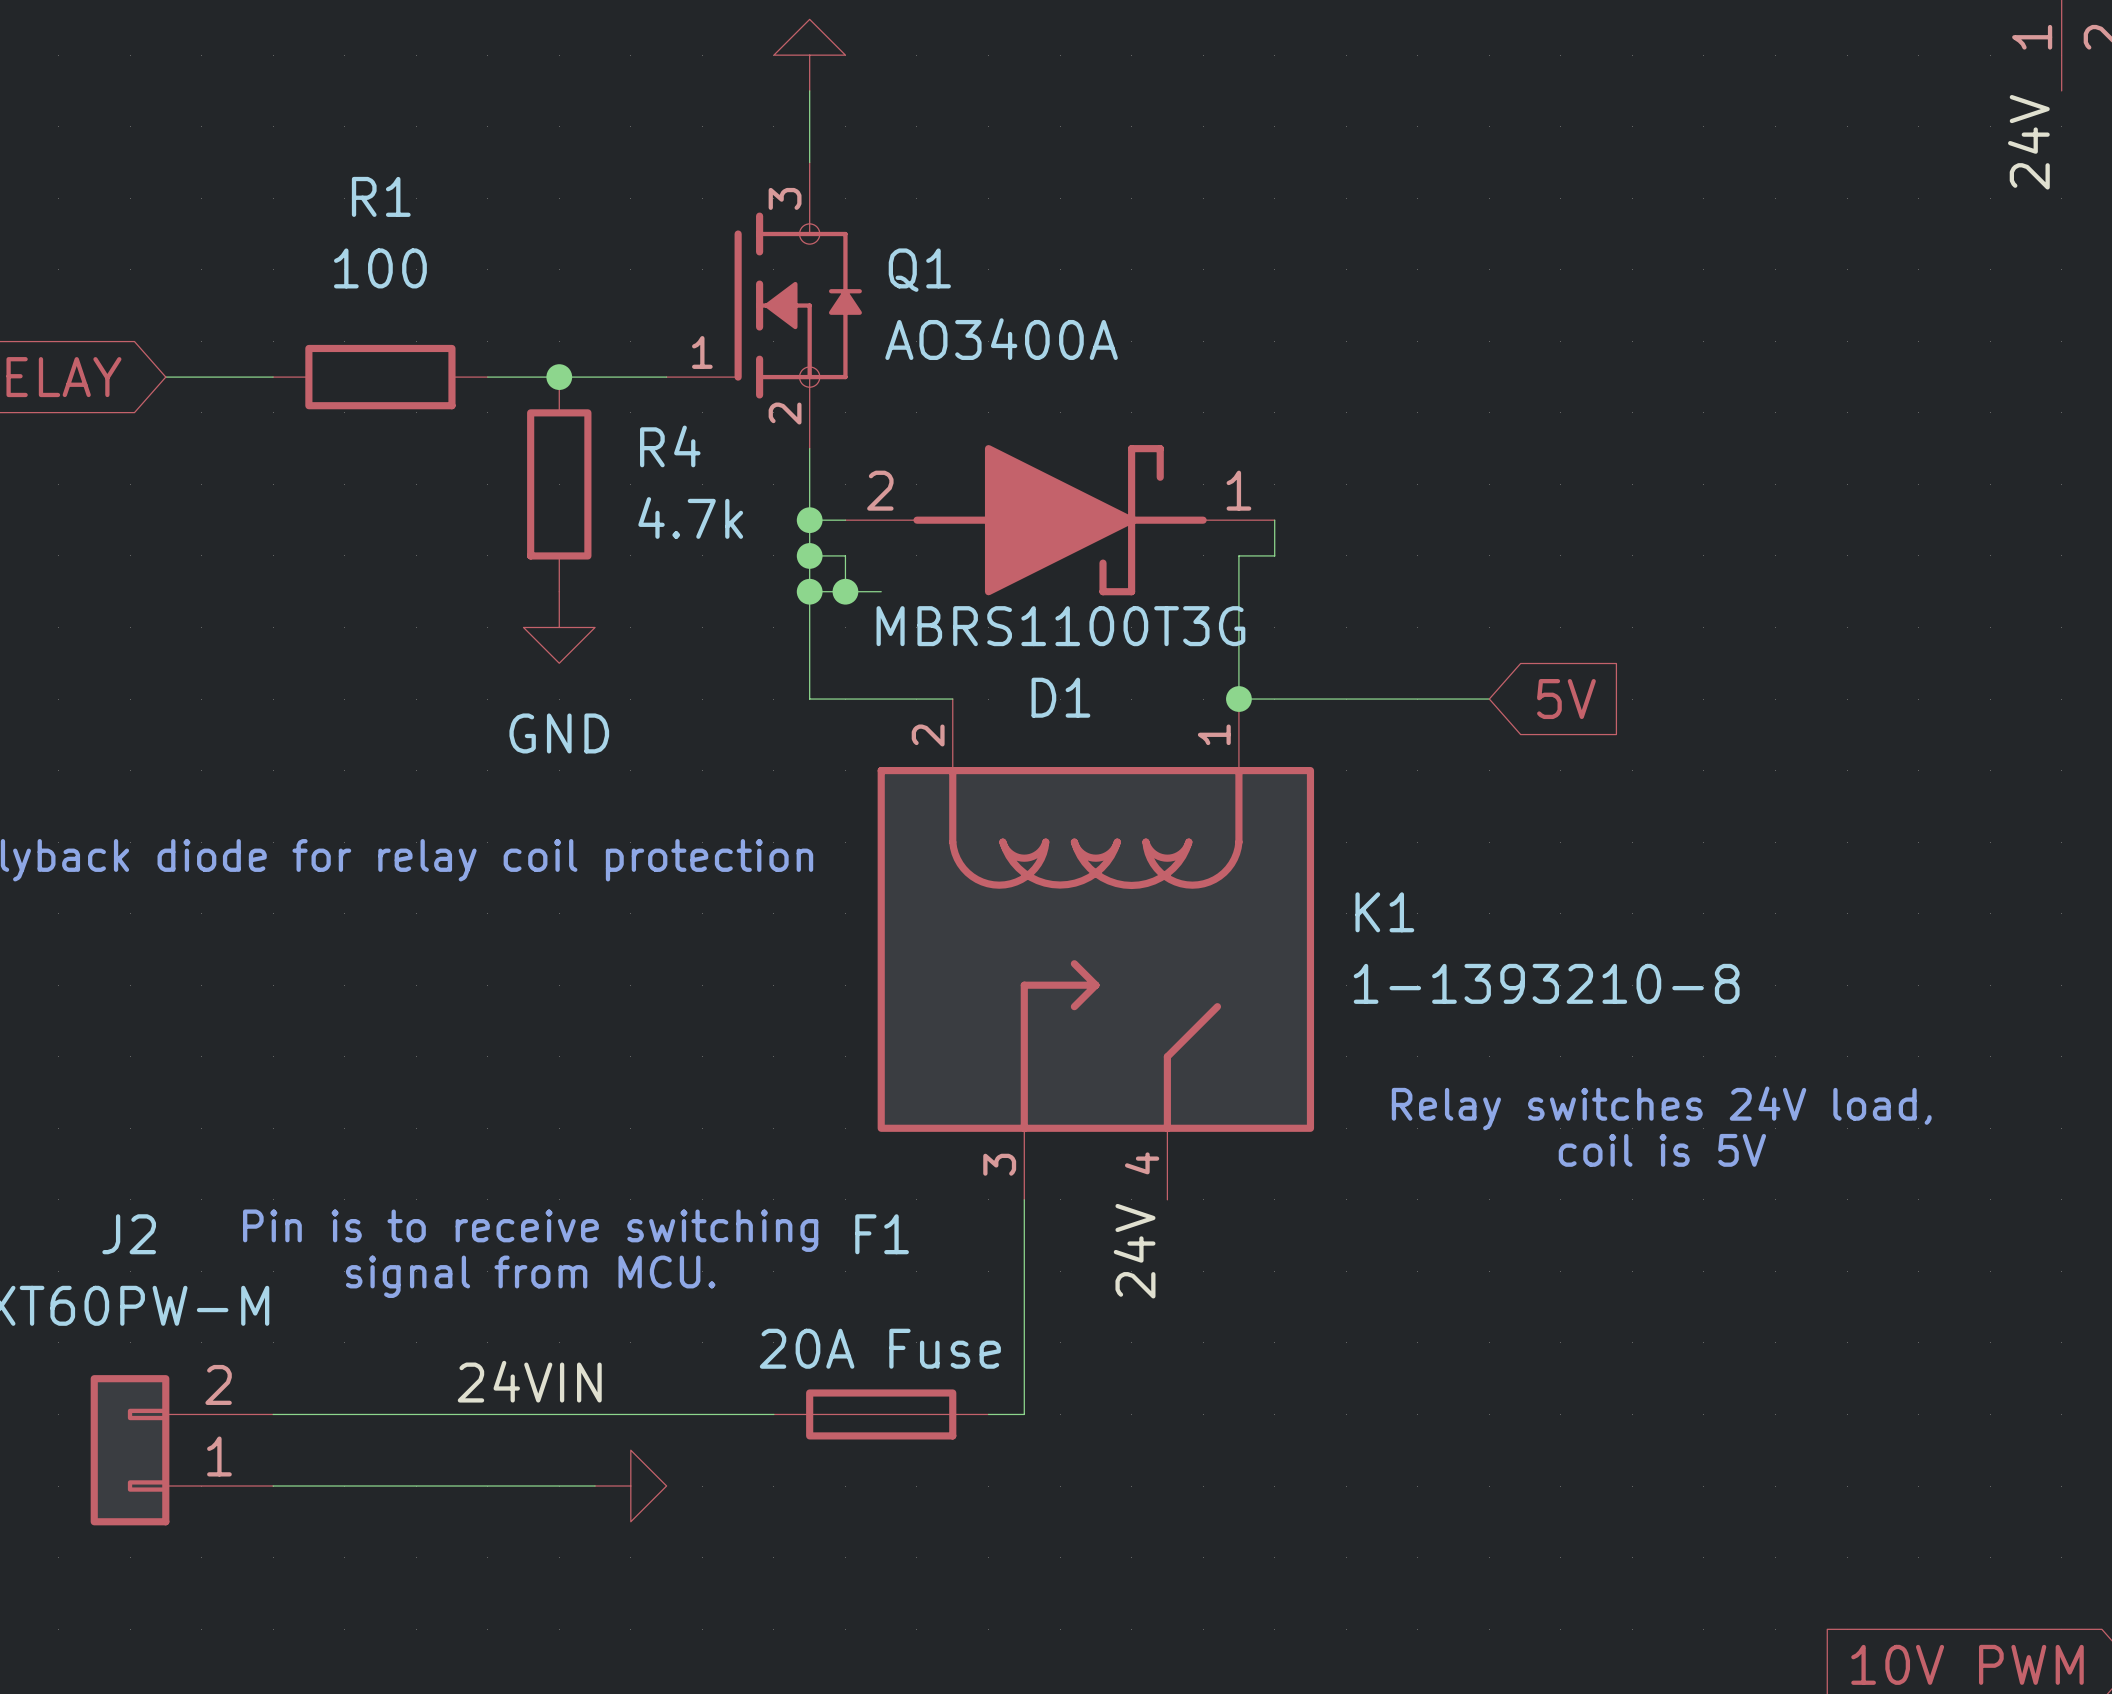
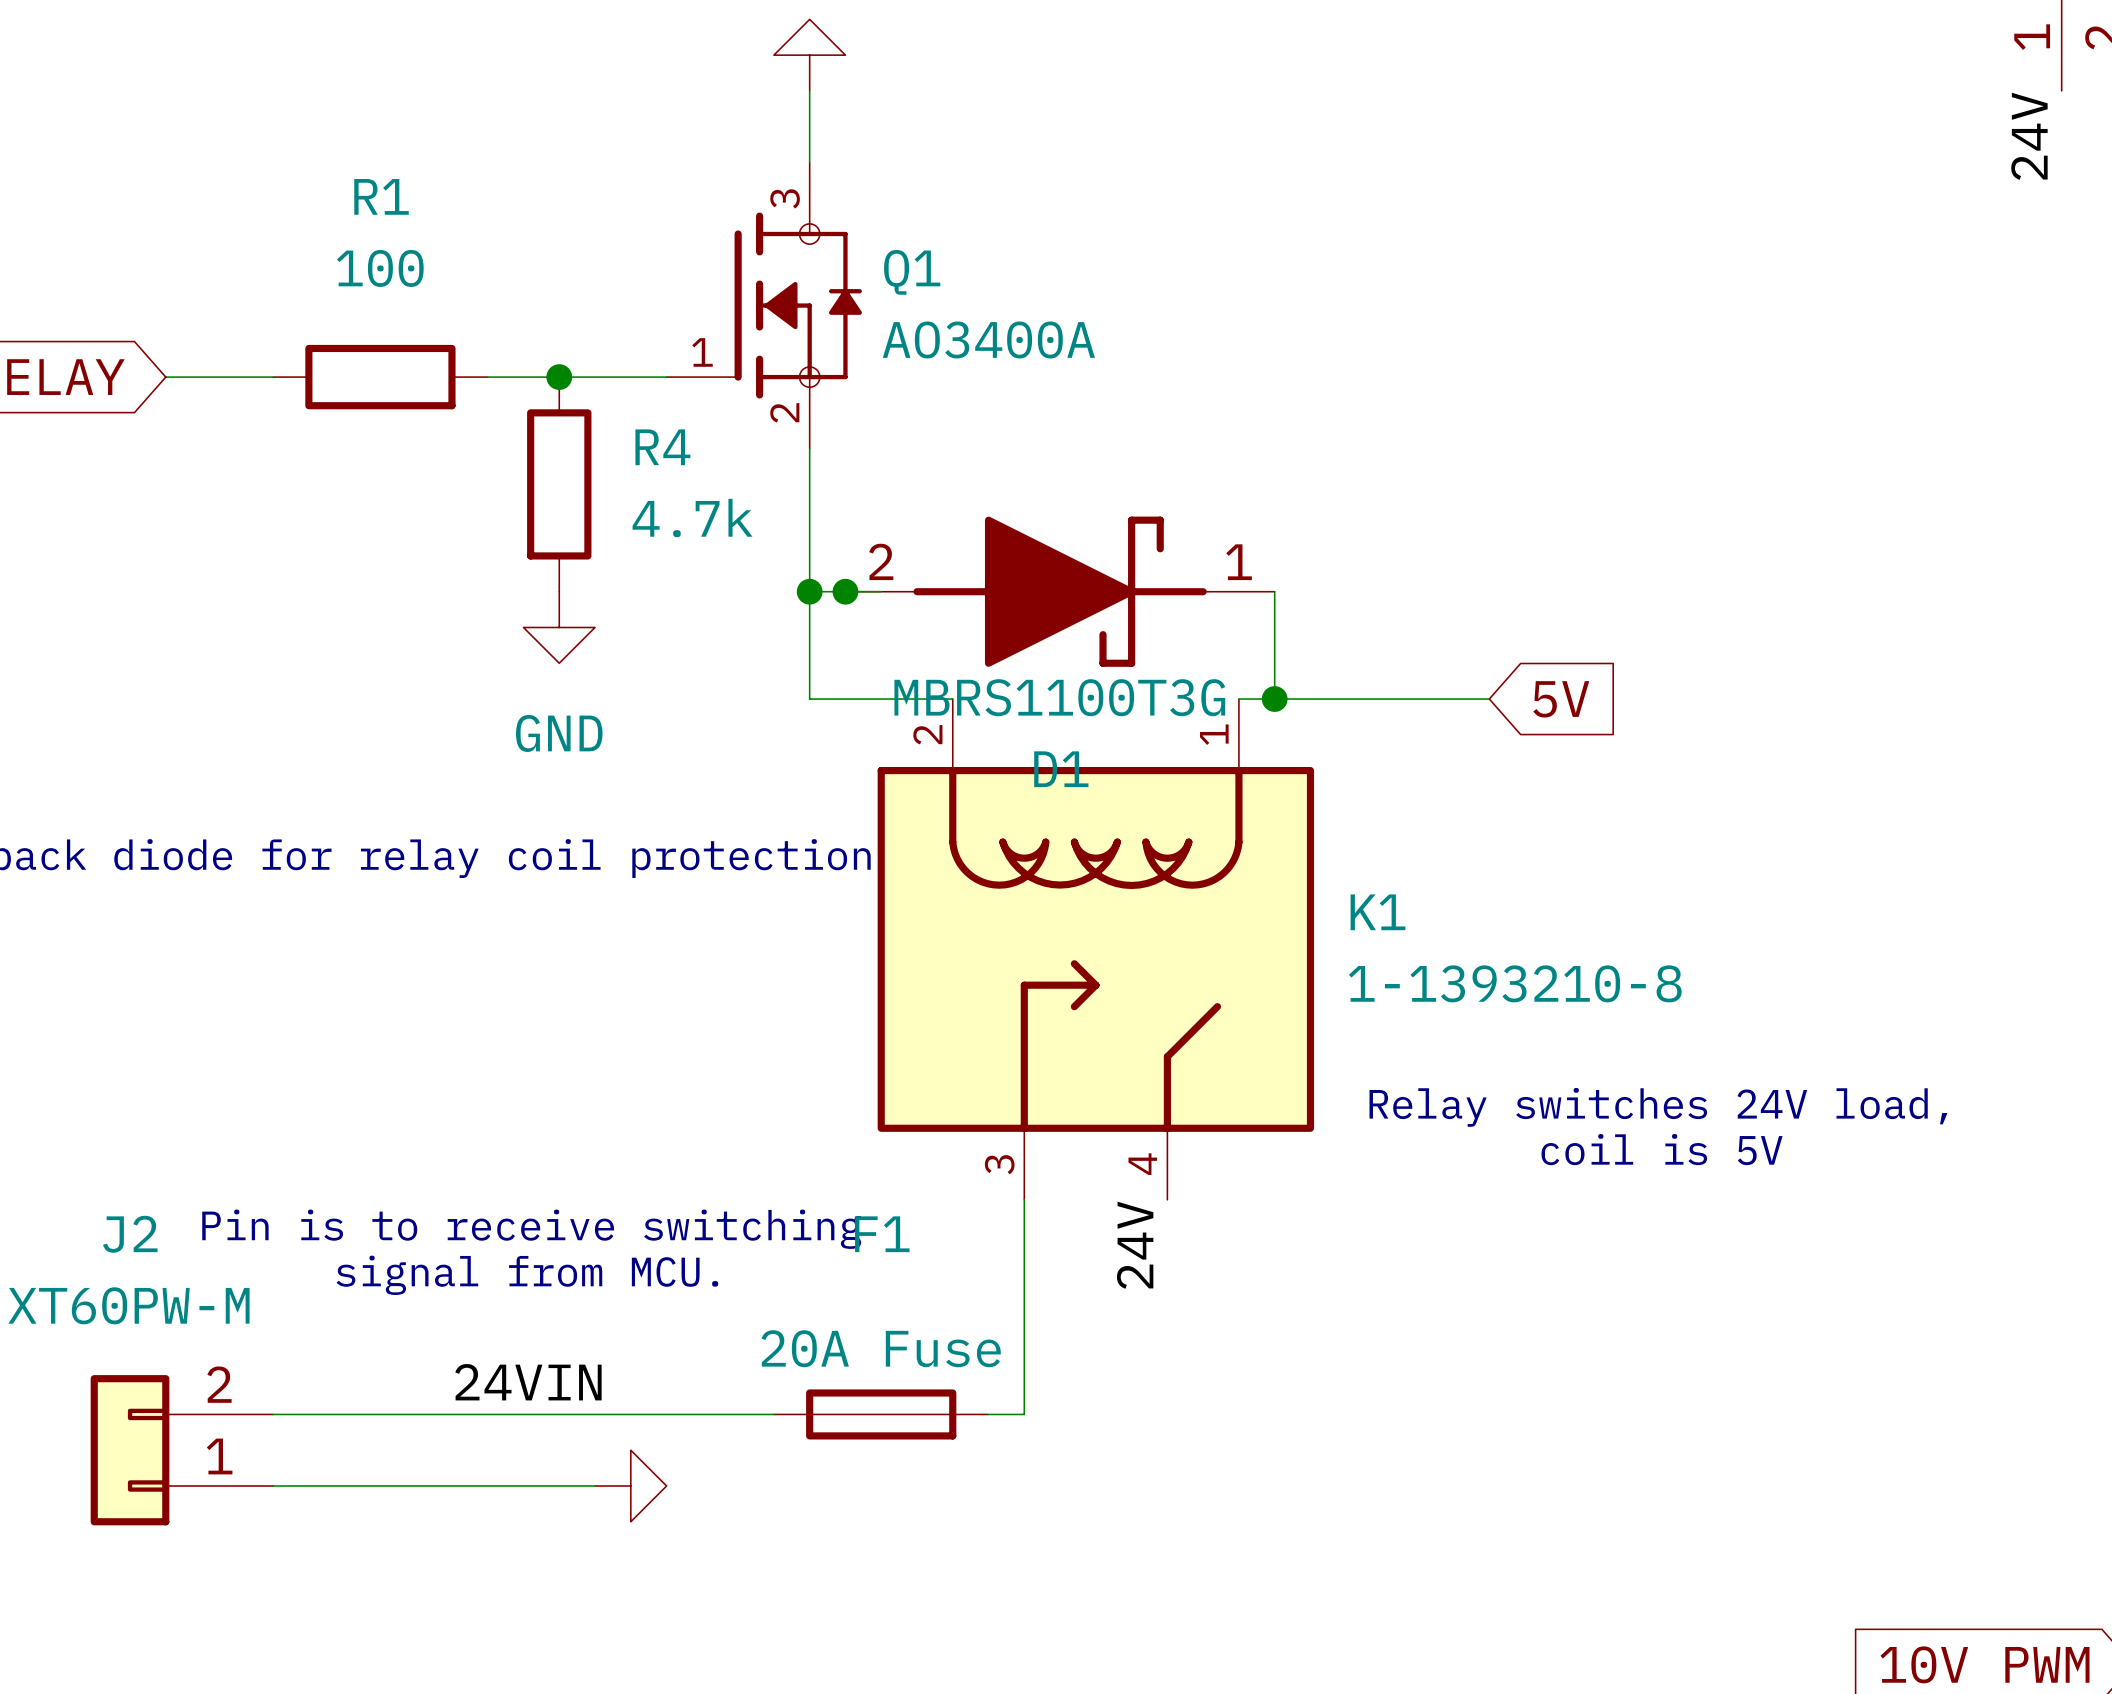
wire: (809, 520) (845, 520) -> none
junction: (809, 520) -> none
D1 position: (1060, 520) -> (1060, 591)
wire: (1274, 520) (1274, 555) (1238, 555) (1238, 699) -> none
wire: (809, 555) (845, 555) (845, 591) -> none
junction: (809, 555) -> none
wire: none -> (1274, 591) (1274, 699)
junction position: (1238, 699) -> (1274, 699)

